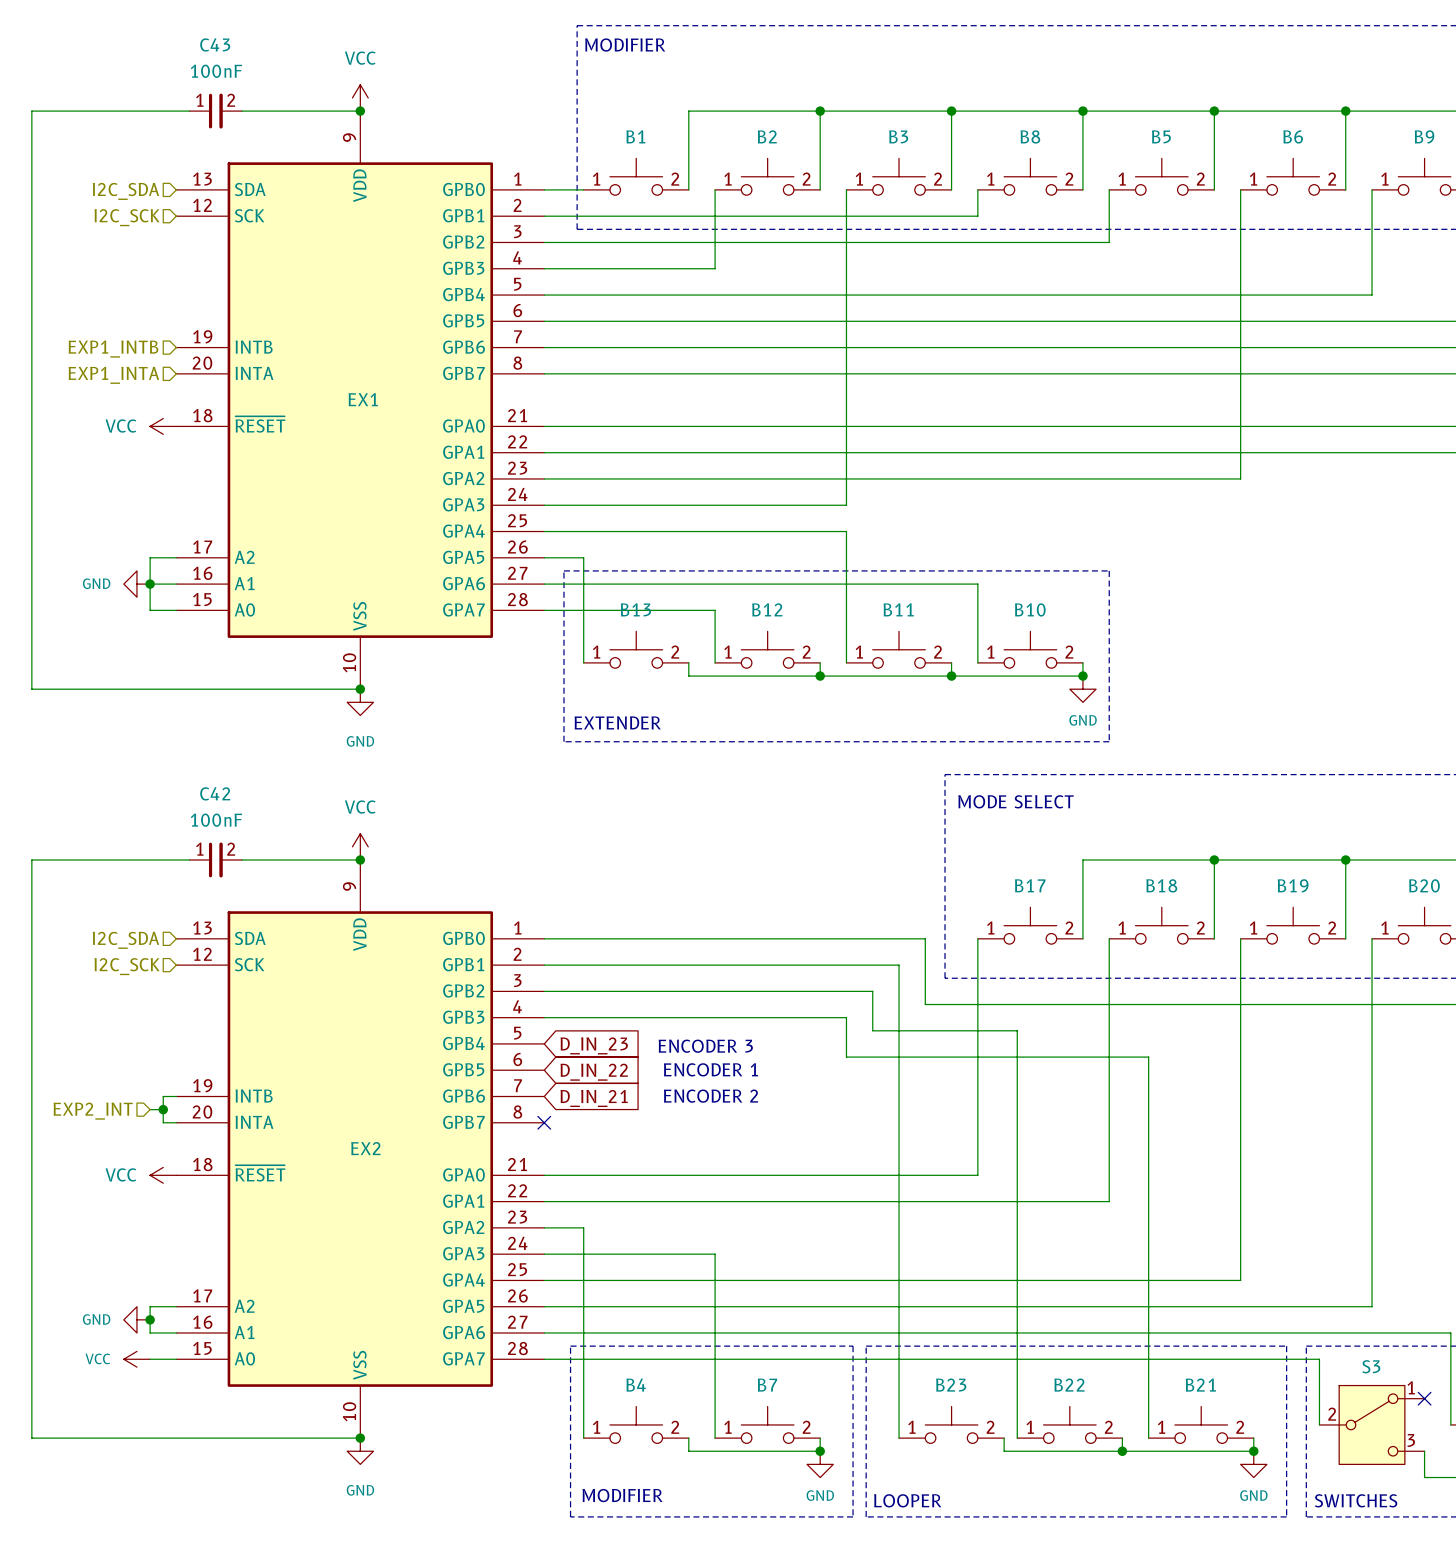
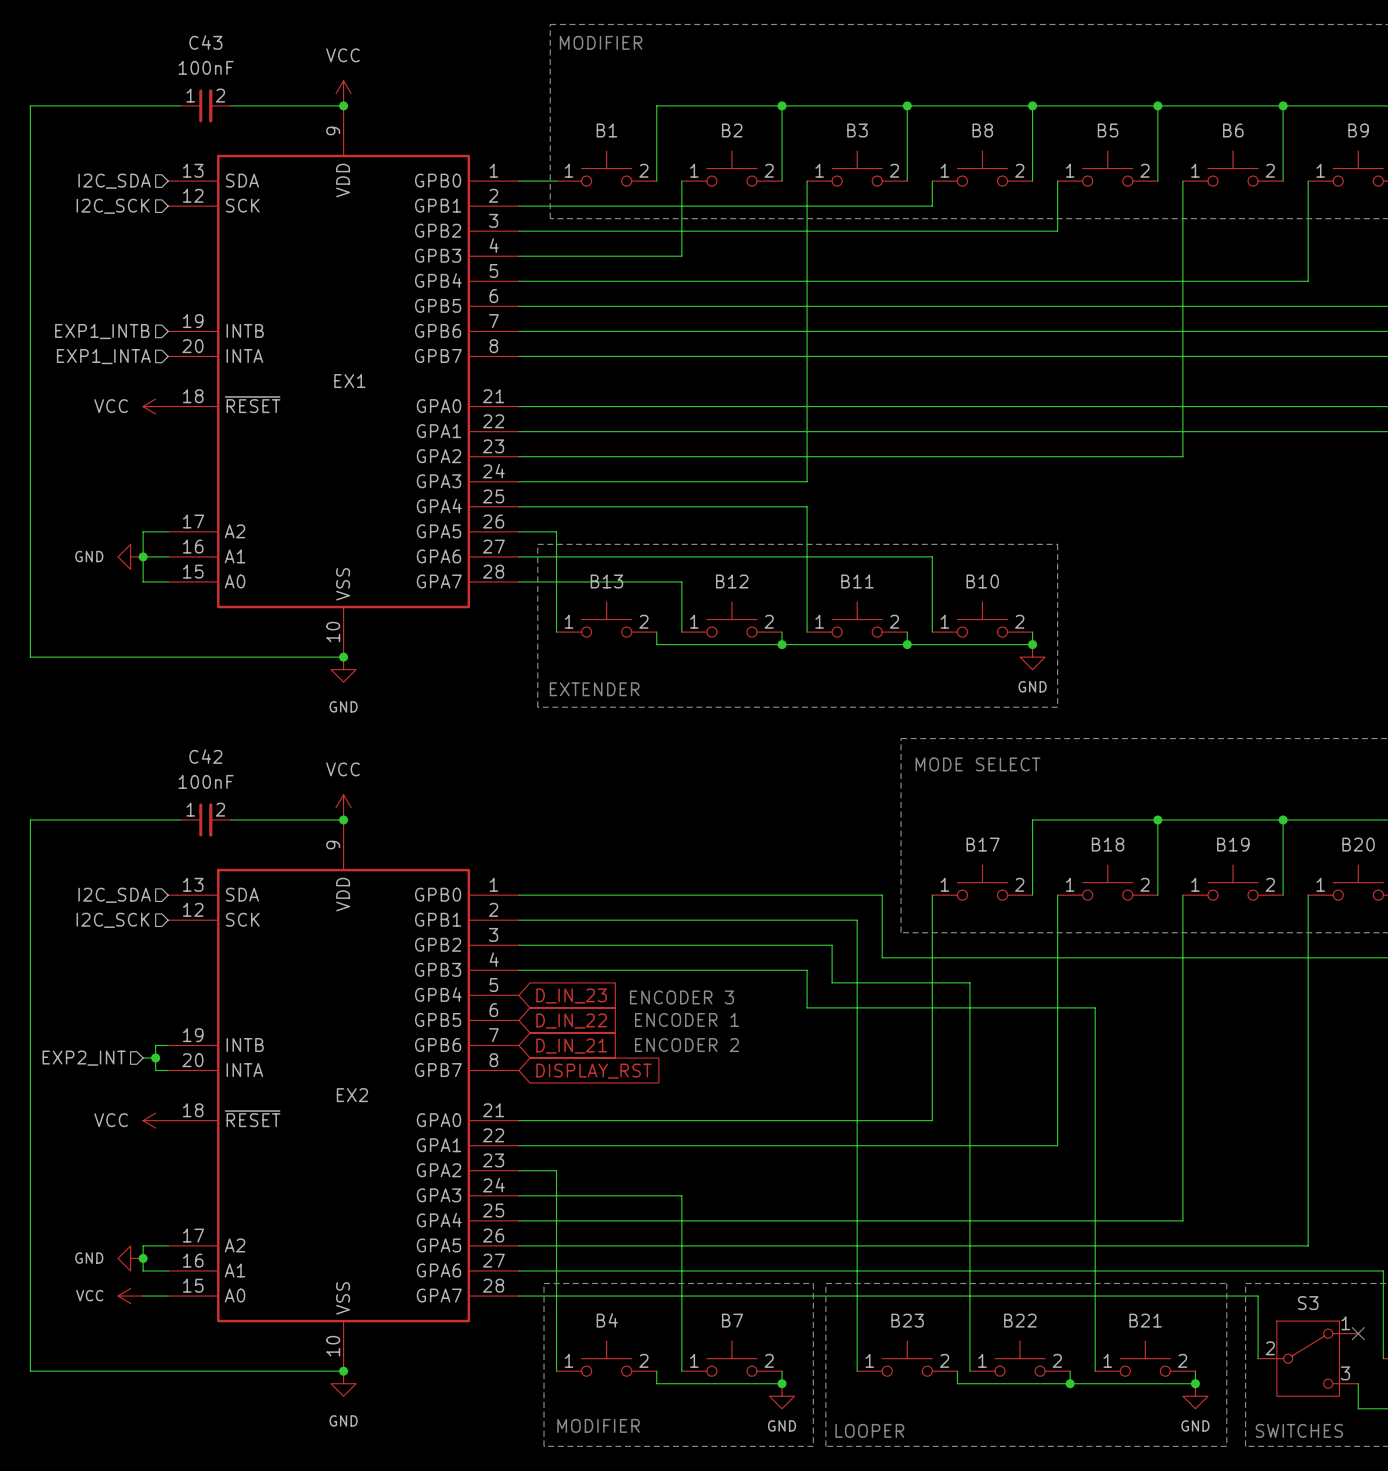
no-connect mark: (544, 1122) -> none
global label: none -> DISPLAY_RST (593, 1071)

